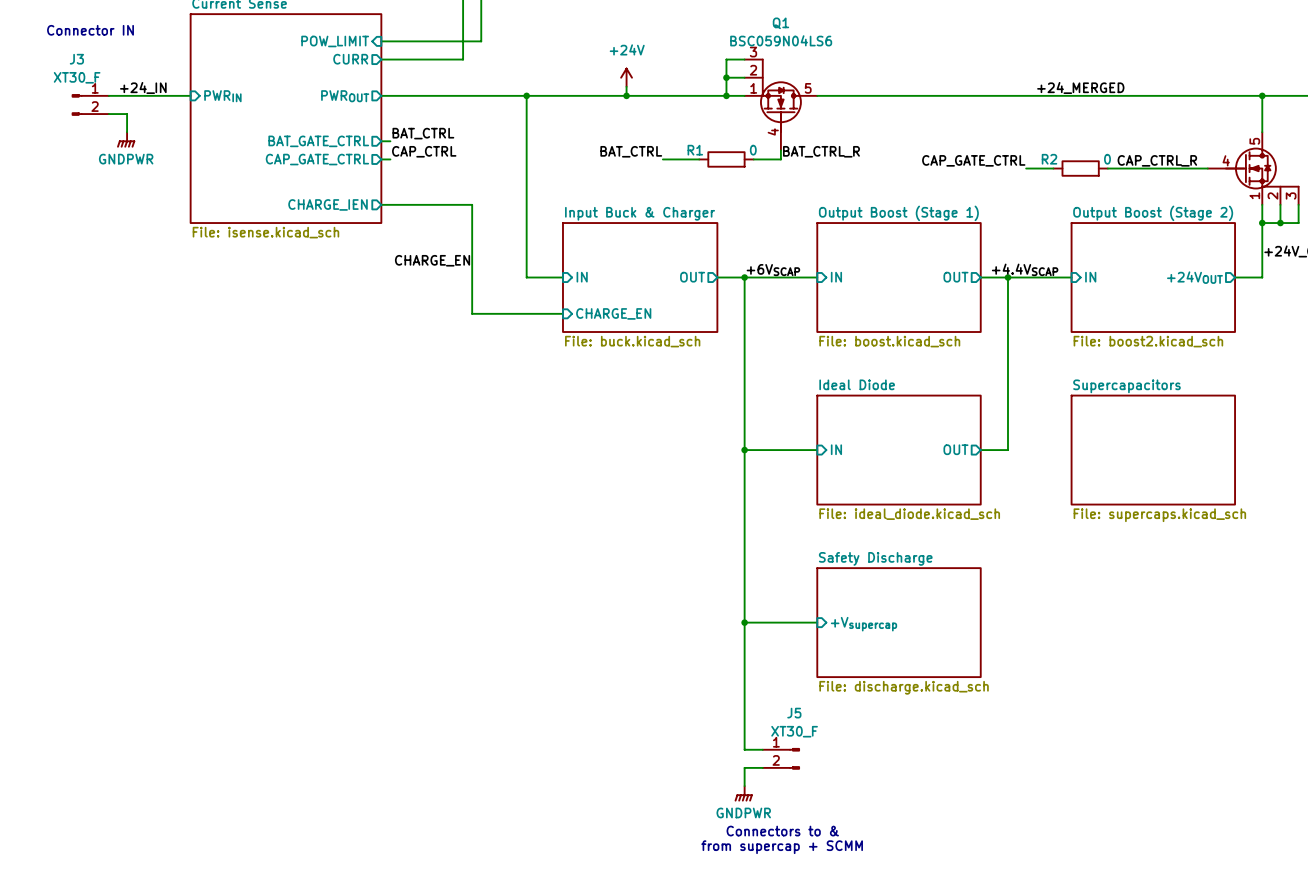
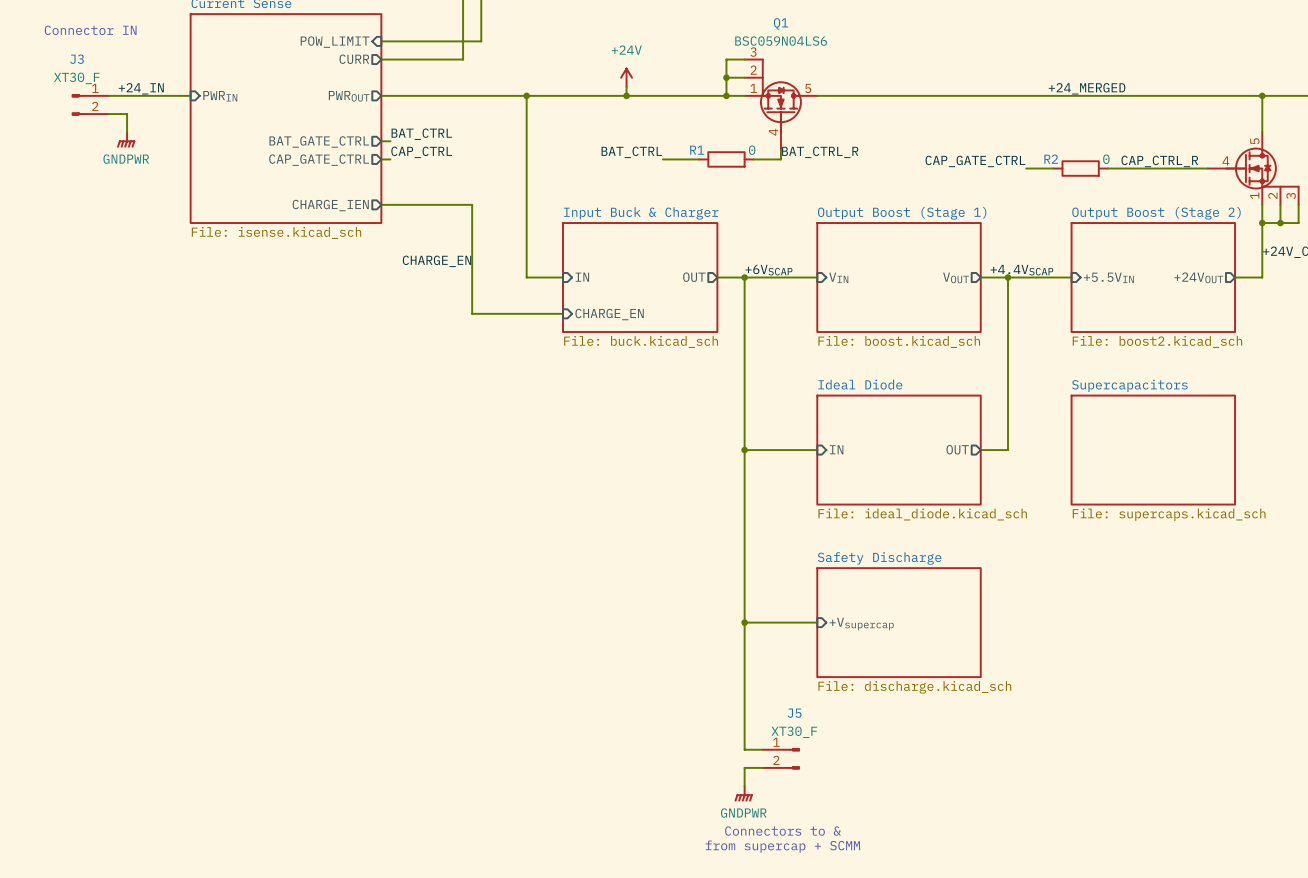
sheet pin: IN (836, 277) -> VIN (838, 277)
sheet pin: OUT (955, 277) -> VOUT (956, 277)
sheet pin: IN (1090, 277) -> +5.5VIN (1108, 277)

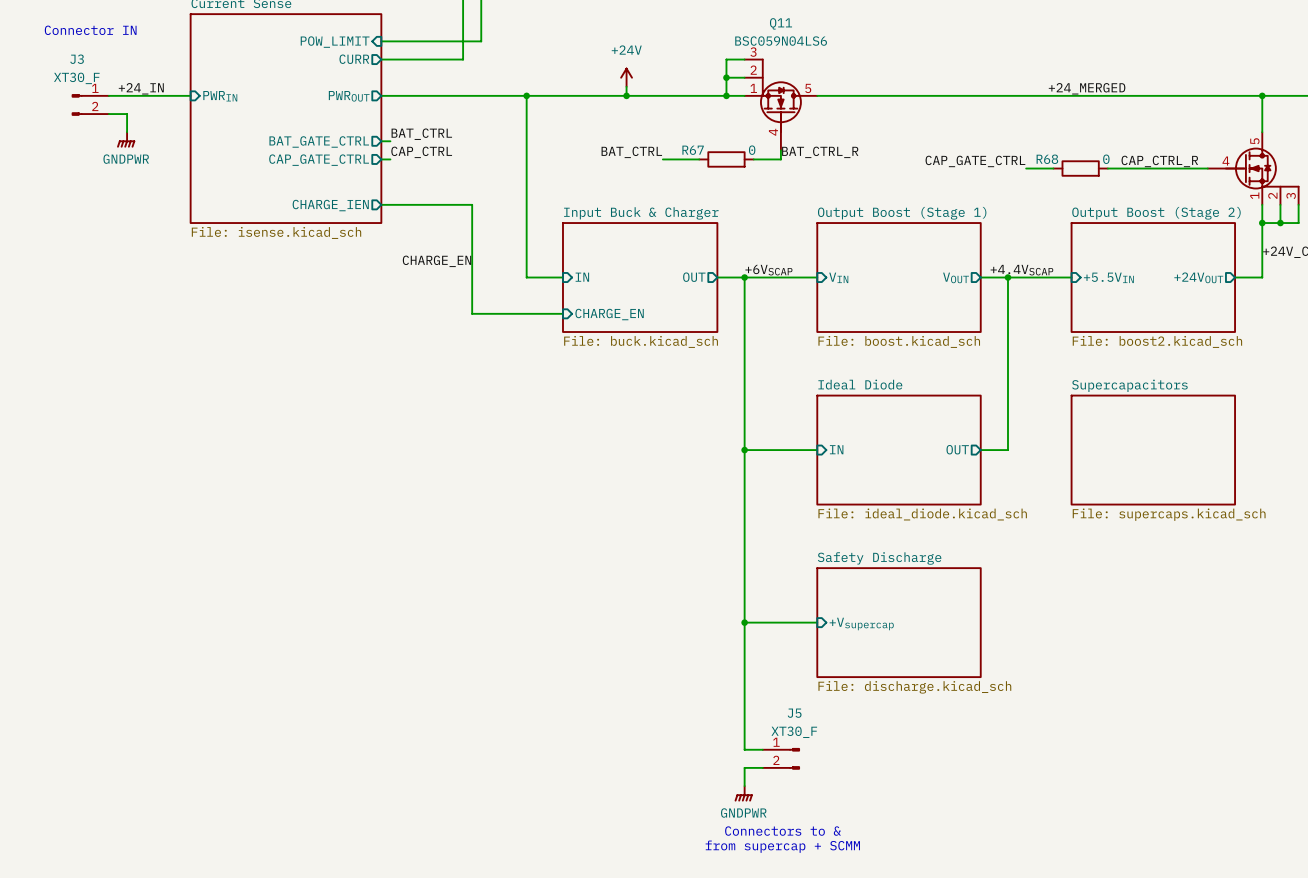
Q1 name: Q1 (781, 23) -> Q11 (781, 23)
R1 name: R1 (697, 150) -> R67 (693, 150)
R2 name: R2 (1051, 159) -> R68 (1047, 159)

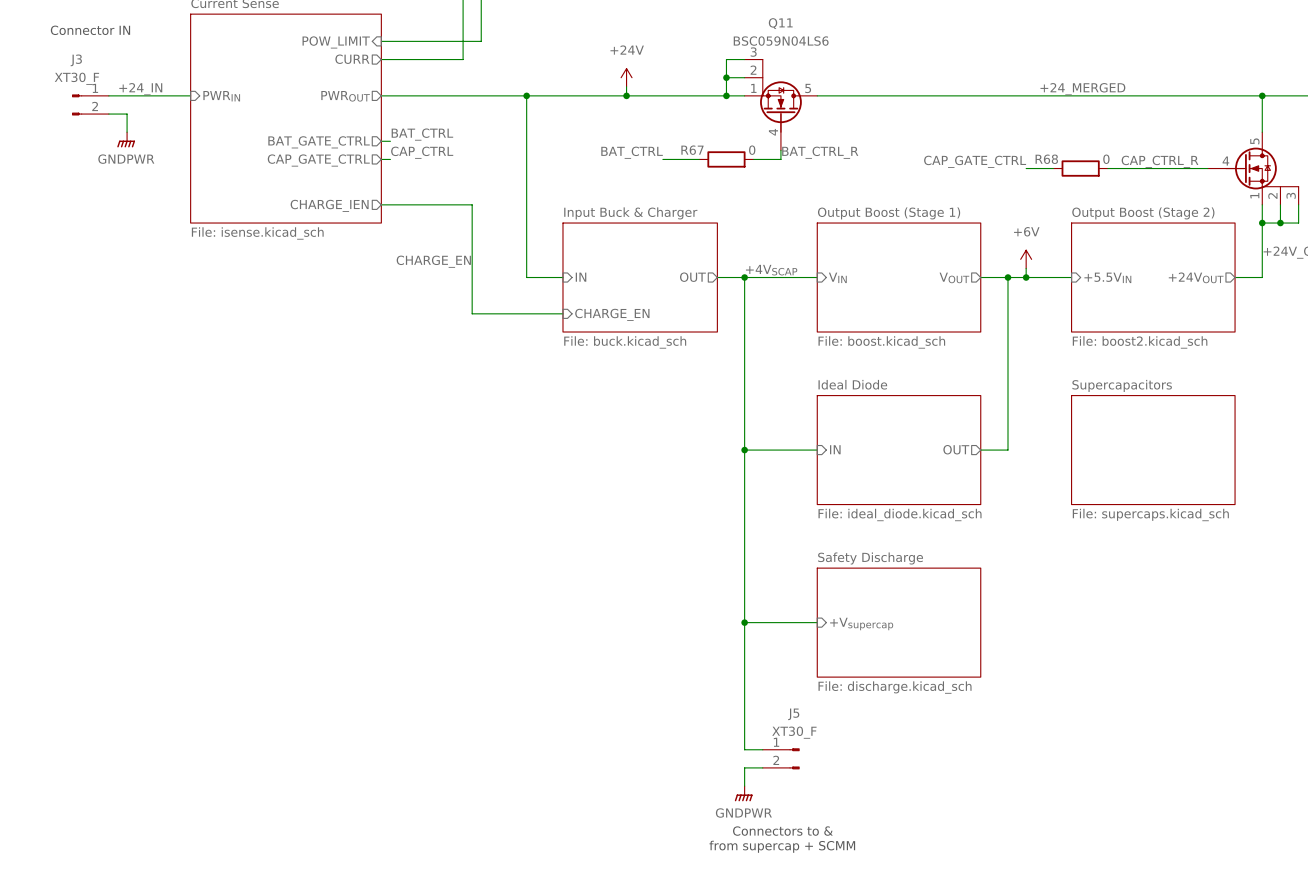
power symbol: none -> +6V (1026, 259)
wire: none -> (1026, 268) (1026, 277)
label: +6VSCAP (768, 270) -> +4VSCAP (771, 270)
label: +4.4VSCAP (1021, 270) -> none
junction: none -> (1026, 277)

